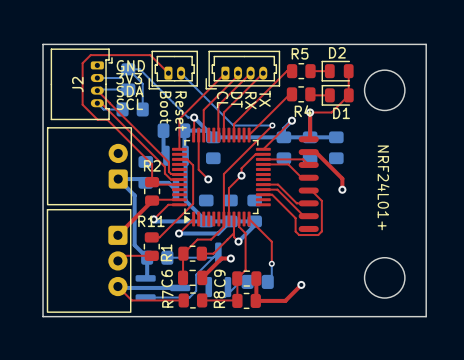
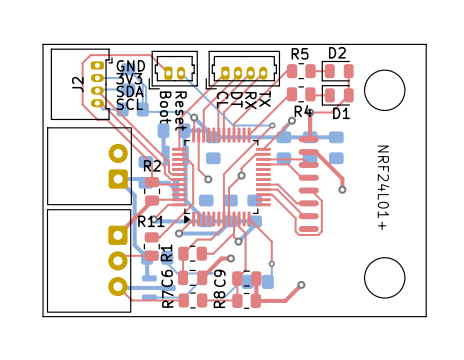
bottom track: (128, 69) (139, 69) (188, 117) (192, 117) -> (142, 83) (146, 87) (146, 111) (187, 111) (192, 117)
bottom track: (218, 252) (196, 274) (196, 290) (189, 297) (183, 297) -> (207, 273) (183, 297)
bottom track: (167, 257) (213, 257) -> none
bottom track: none -> (167, 263) (177, 273) (212, 273)
part: (218, 269) -> none
part footprint: [135, 275, 191, 301] -> [141, 275, 176, 301]

